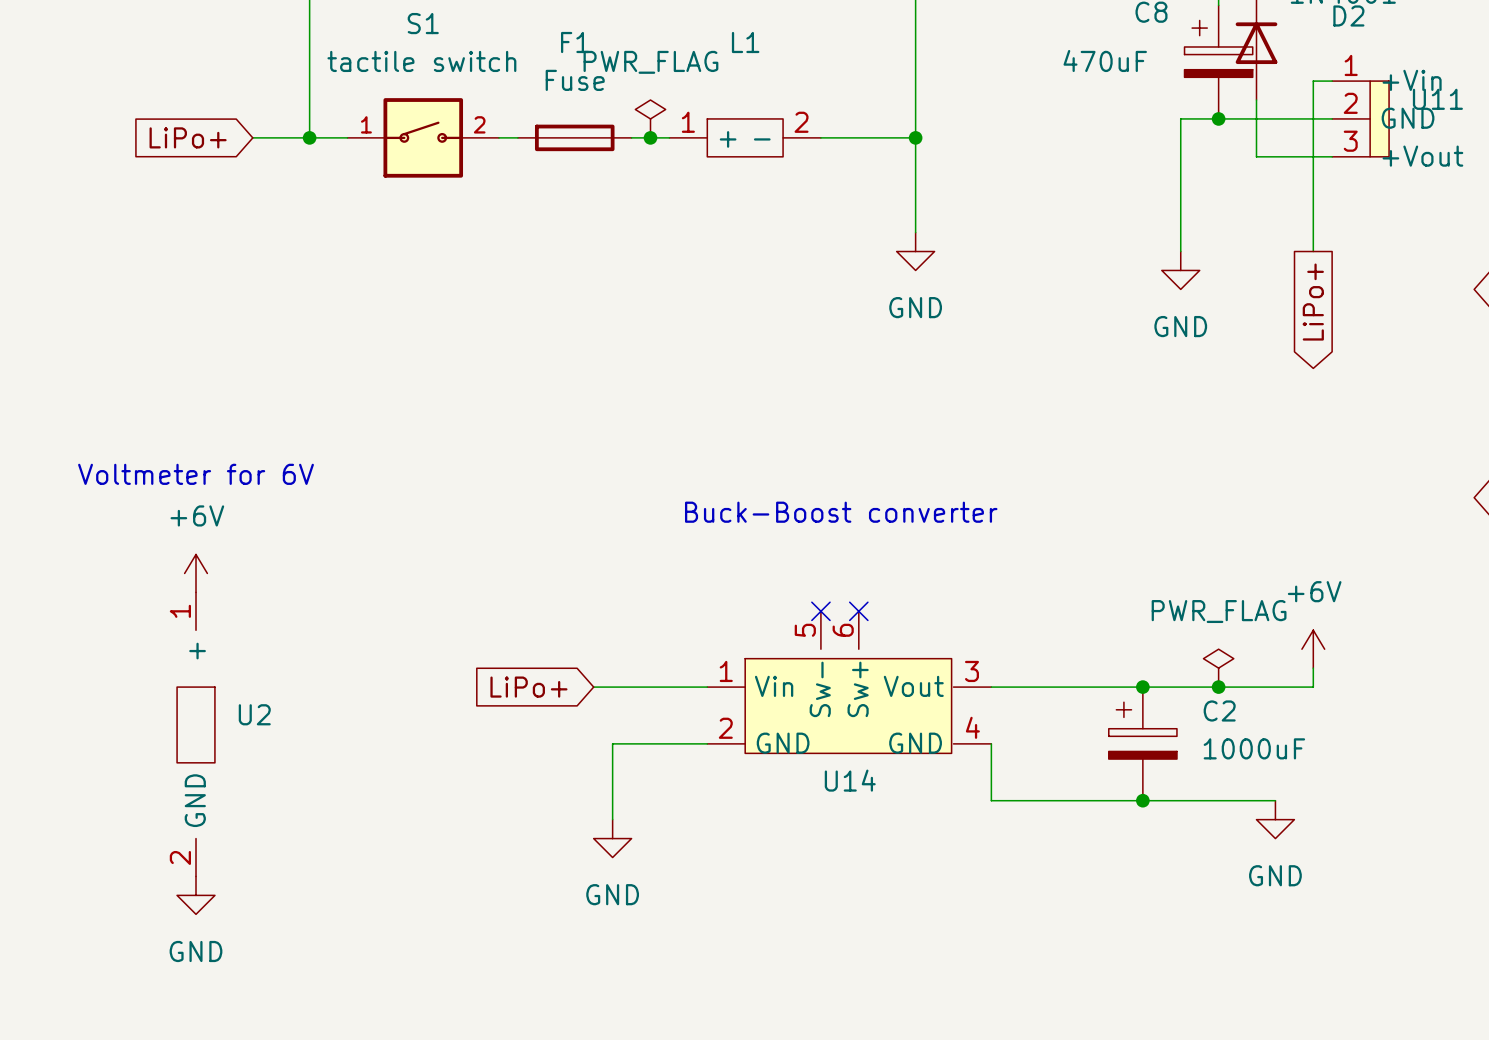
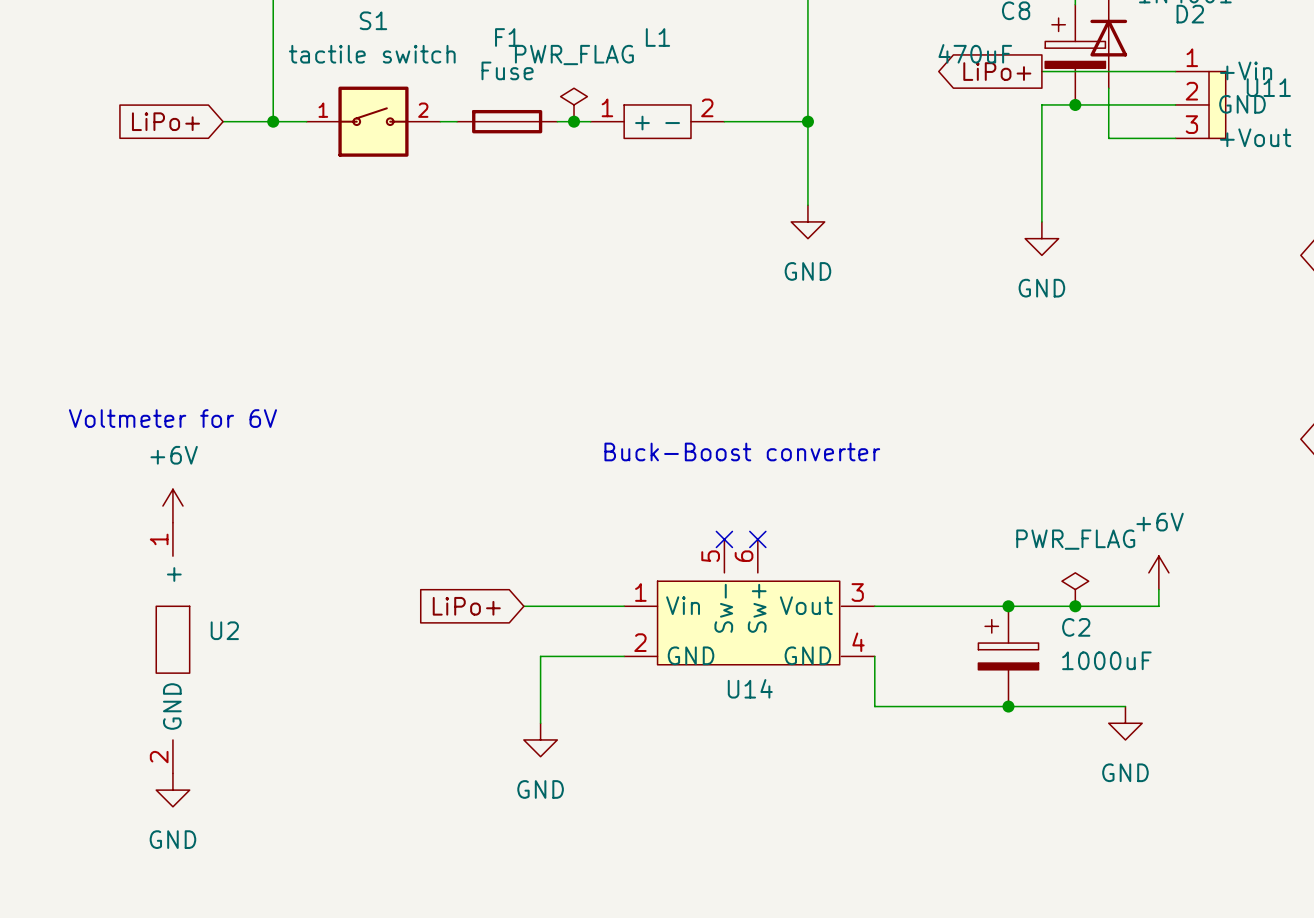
wire: (1313, 81) (1313, 251) -> (1158, 71) (1041, 71)
global label rotation: 0° (1313, 302) -> 90° clockwise (997, 71)
global label position: LiPo+ (1313, 302) -> LiPo+ (997, 71)

